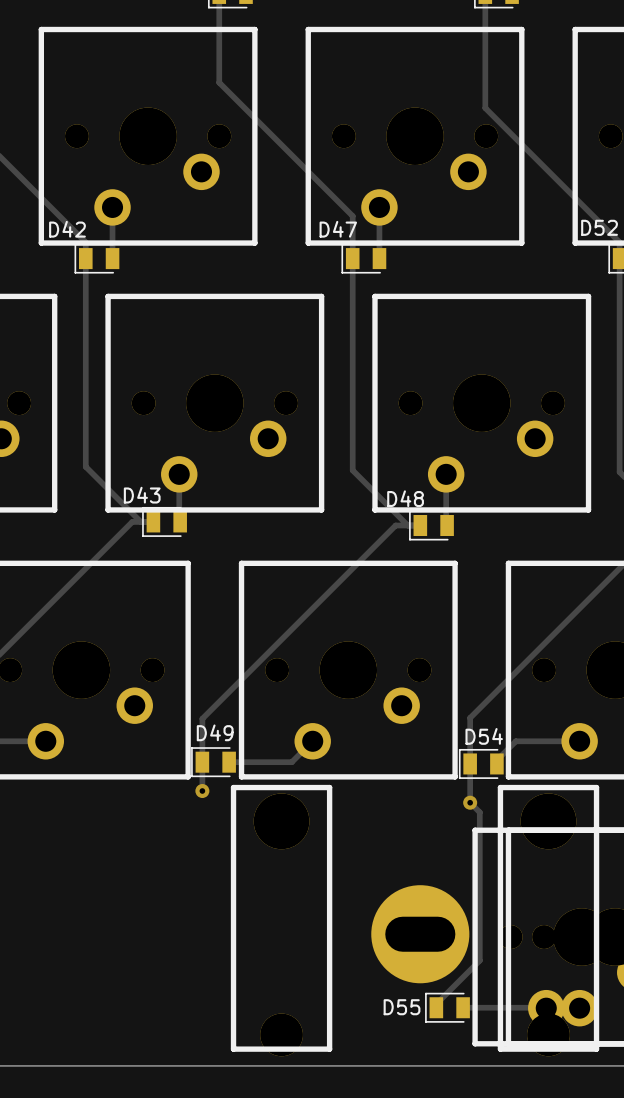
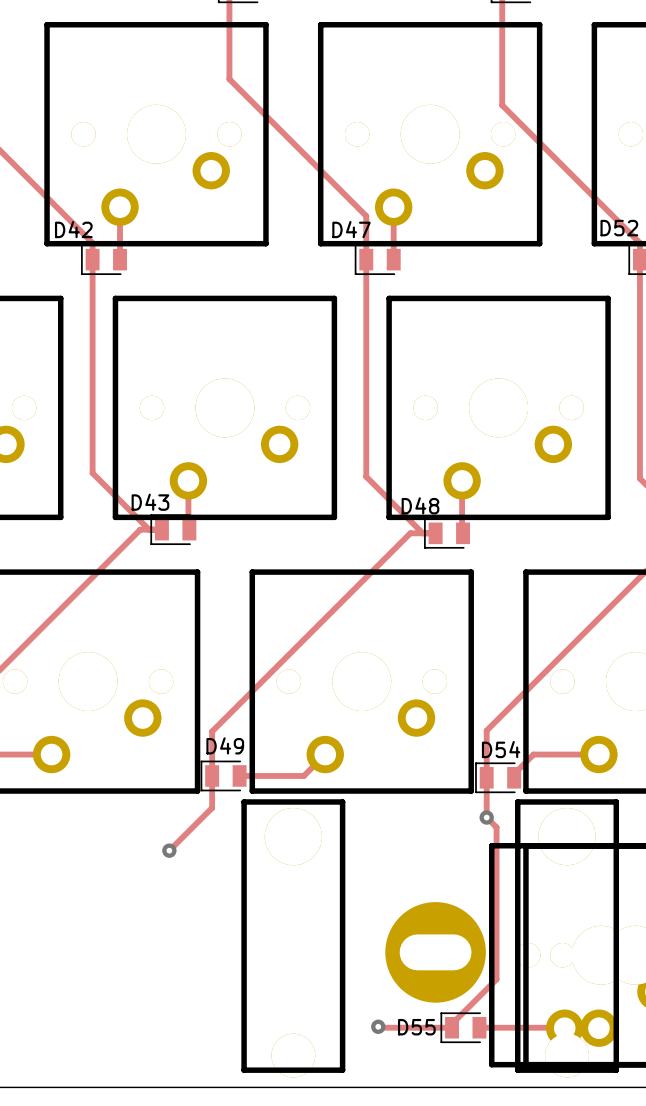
track: none -> (212, 805) (212, 807) (169, 850)
via position: (202, 791) -> (169, 850)
track: none -> (378, 1026) (452, 1027)
via: none -> (378, 1026)

